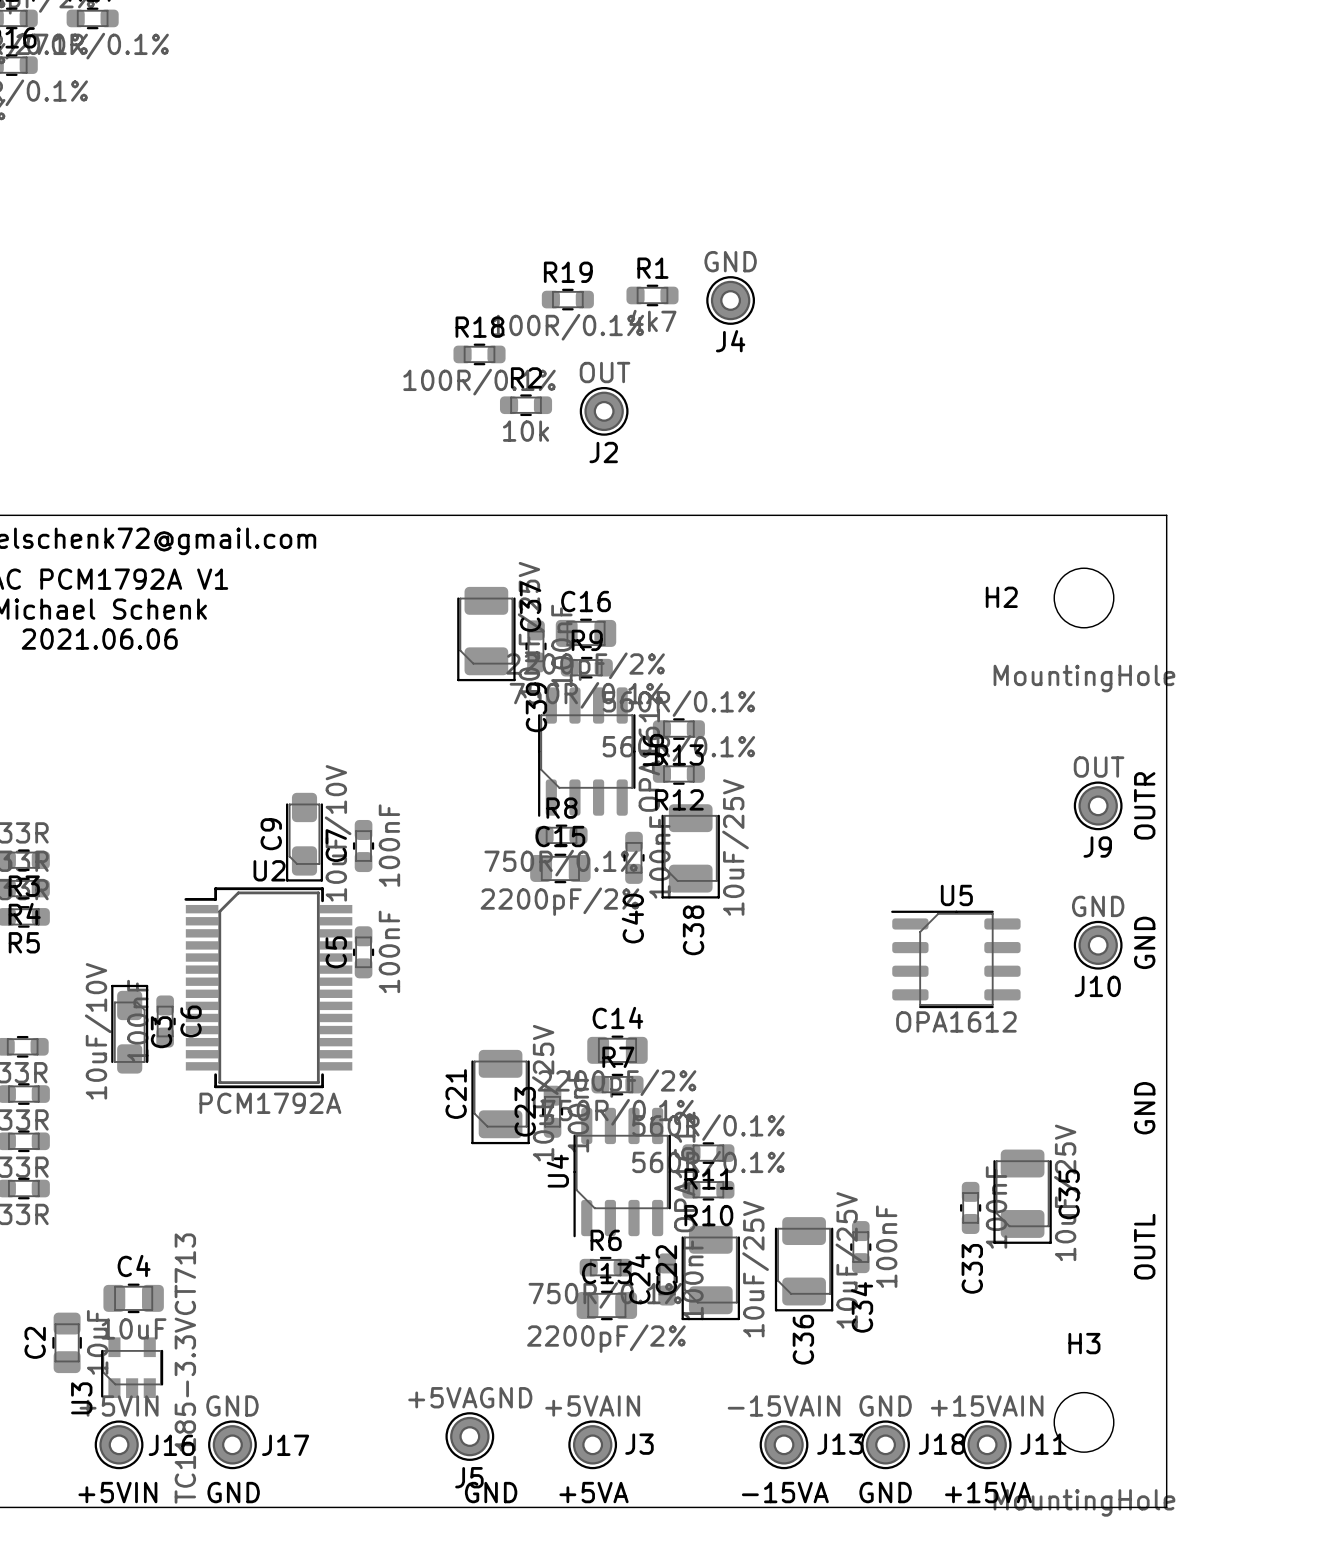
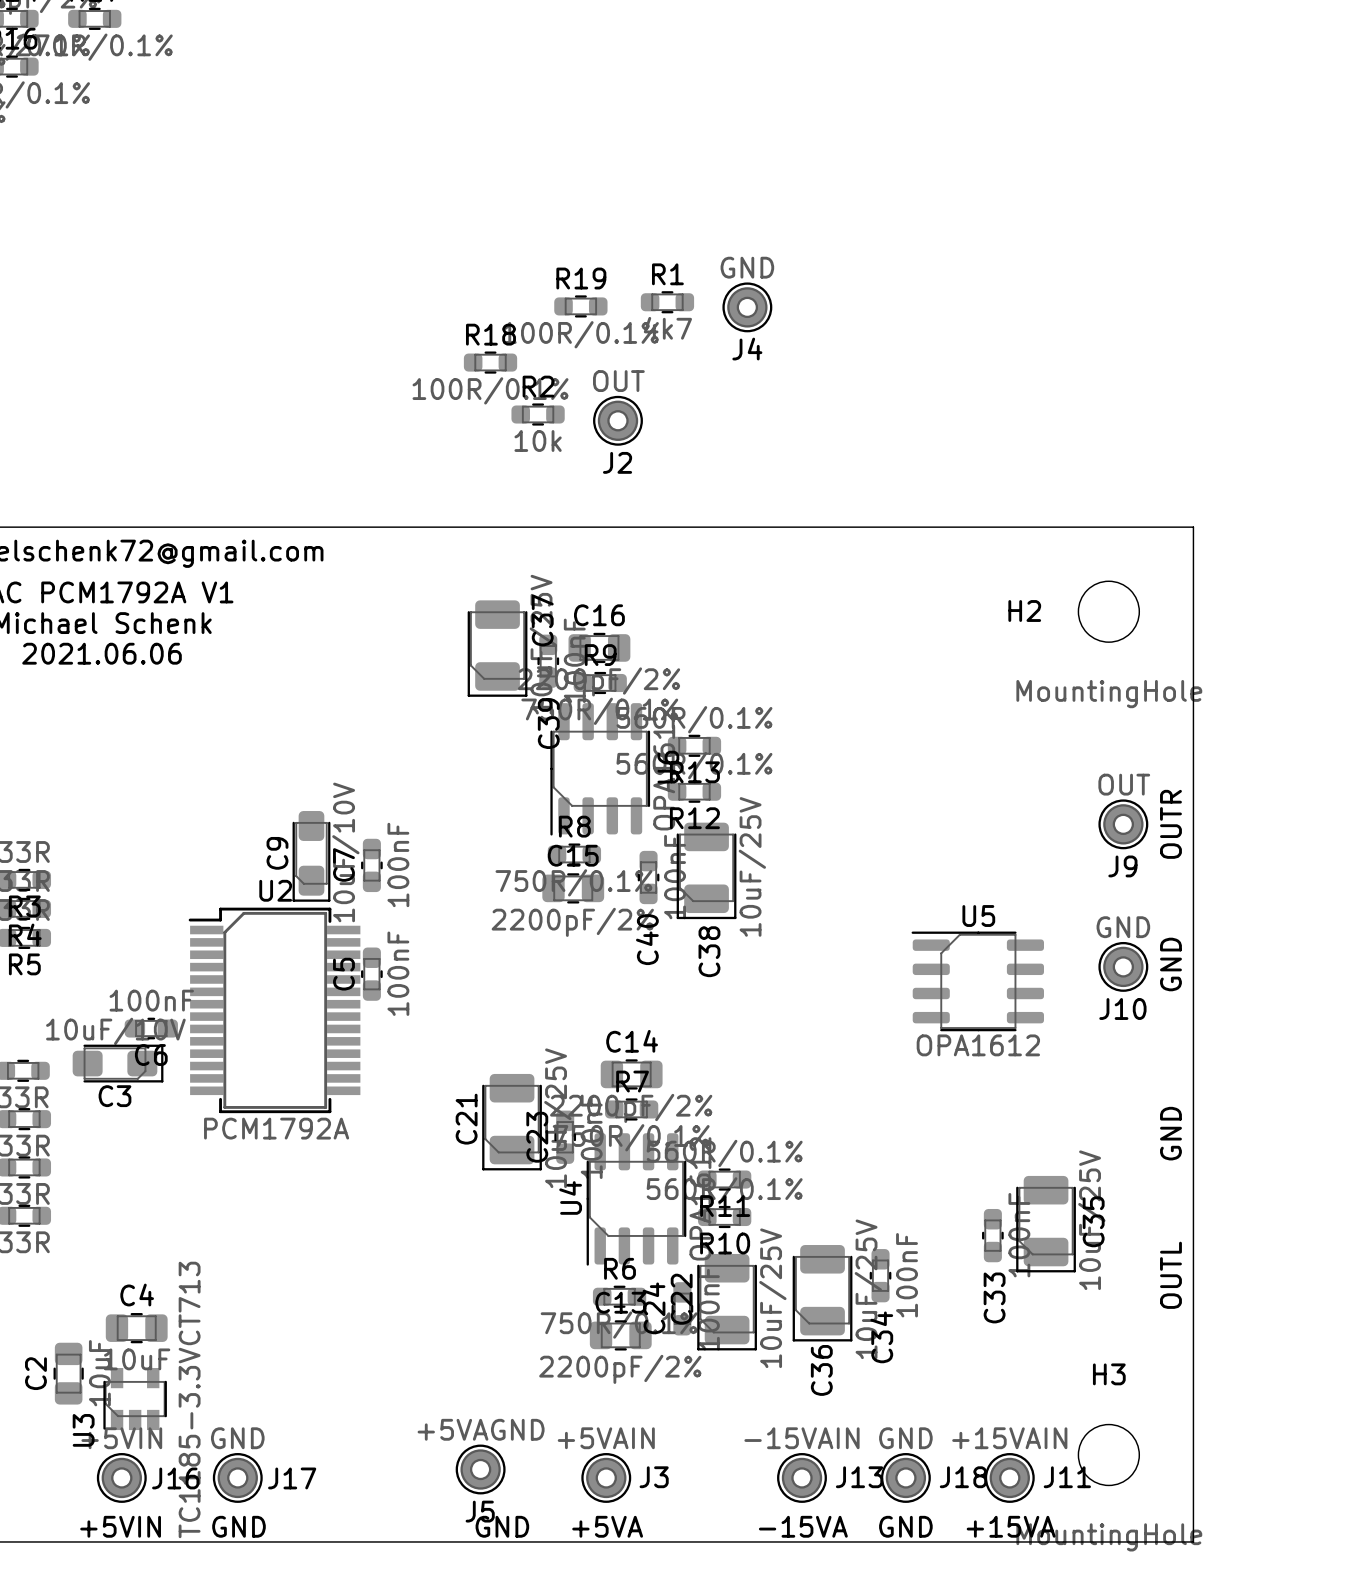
C6 rotation: 0° (165, 1021) -> 90° clockwise (151, 1028)
C3 rotation: 0° (129, 1029) -> 90° clockwise (118, 1063)

